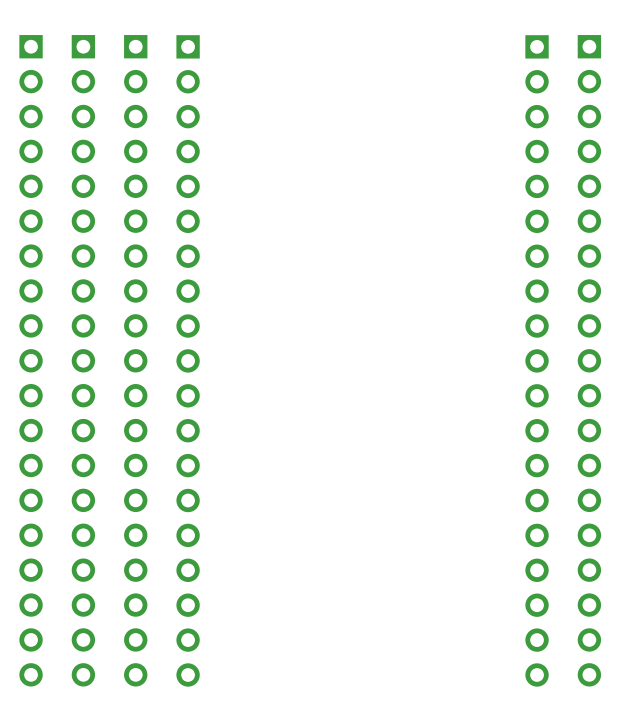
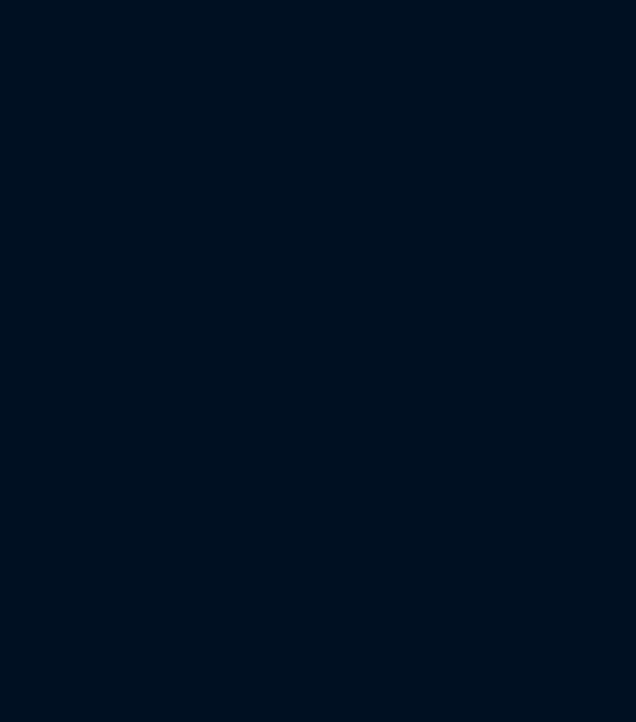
part: (31, 360) -> none
part: (83, 360) -> none
part: (135, 360) -> none
part: (188, 360) -> none
part: (537, 360) -> none
part: (589, 360) -> none

